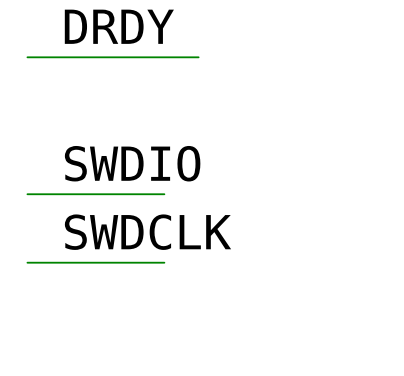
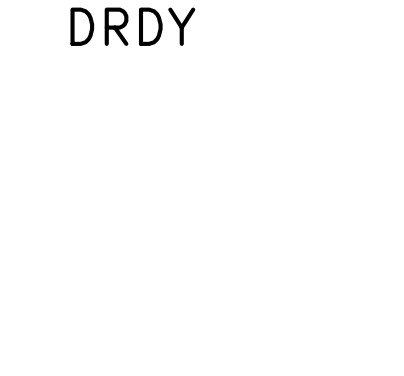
wire: (27, 57) (198, 57) -> none
label: SWDIO (132, 163) -> none
wire: (27, 194) (164, 194) -> none
label: SWDCLK (147, 232) -> none
wire: (27, 262) (164, 262) -> none

